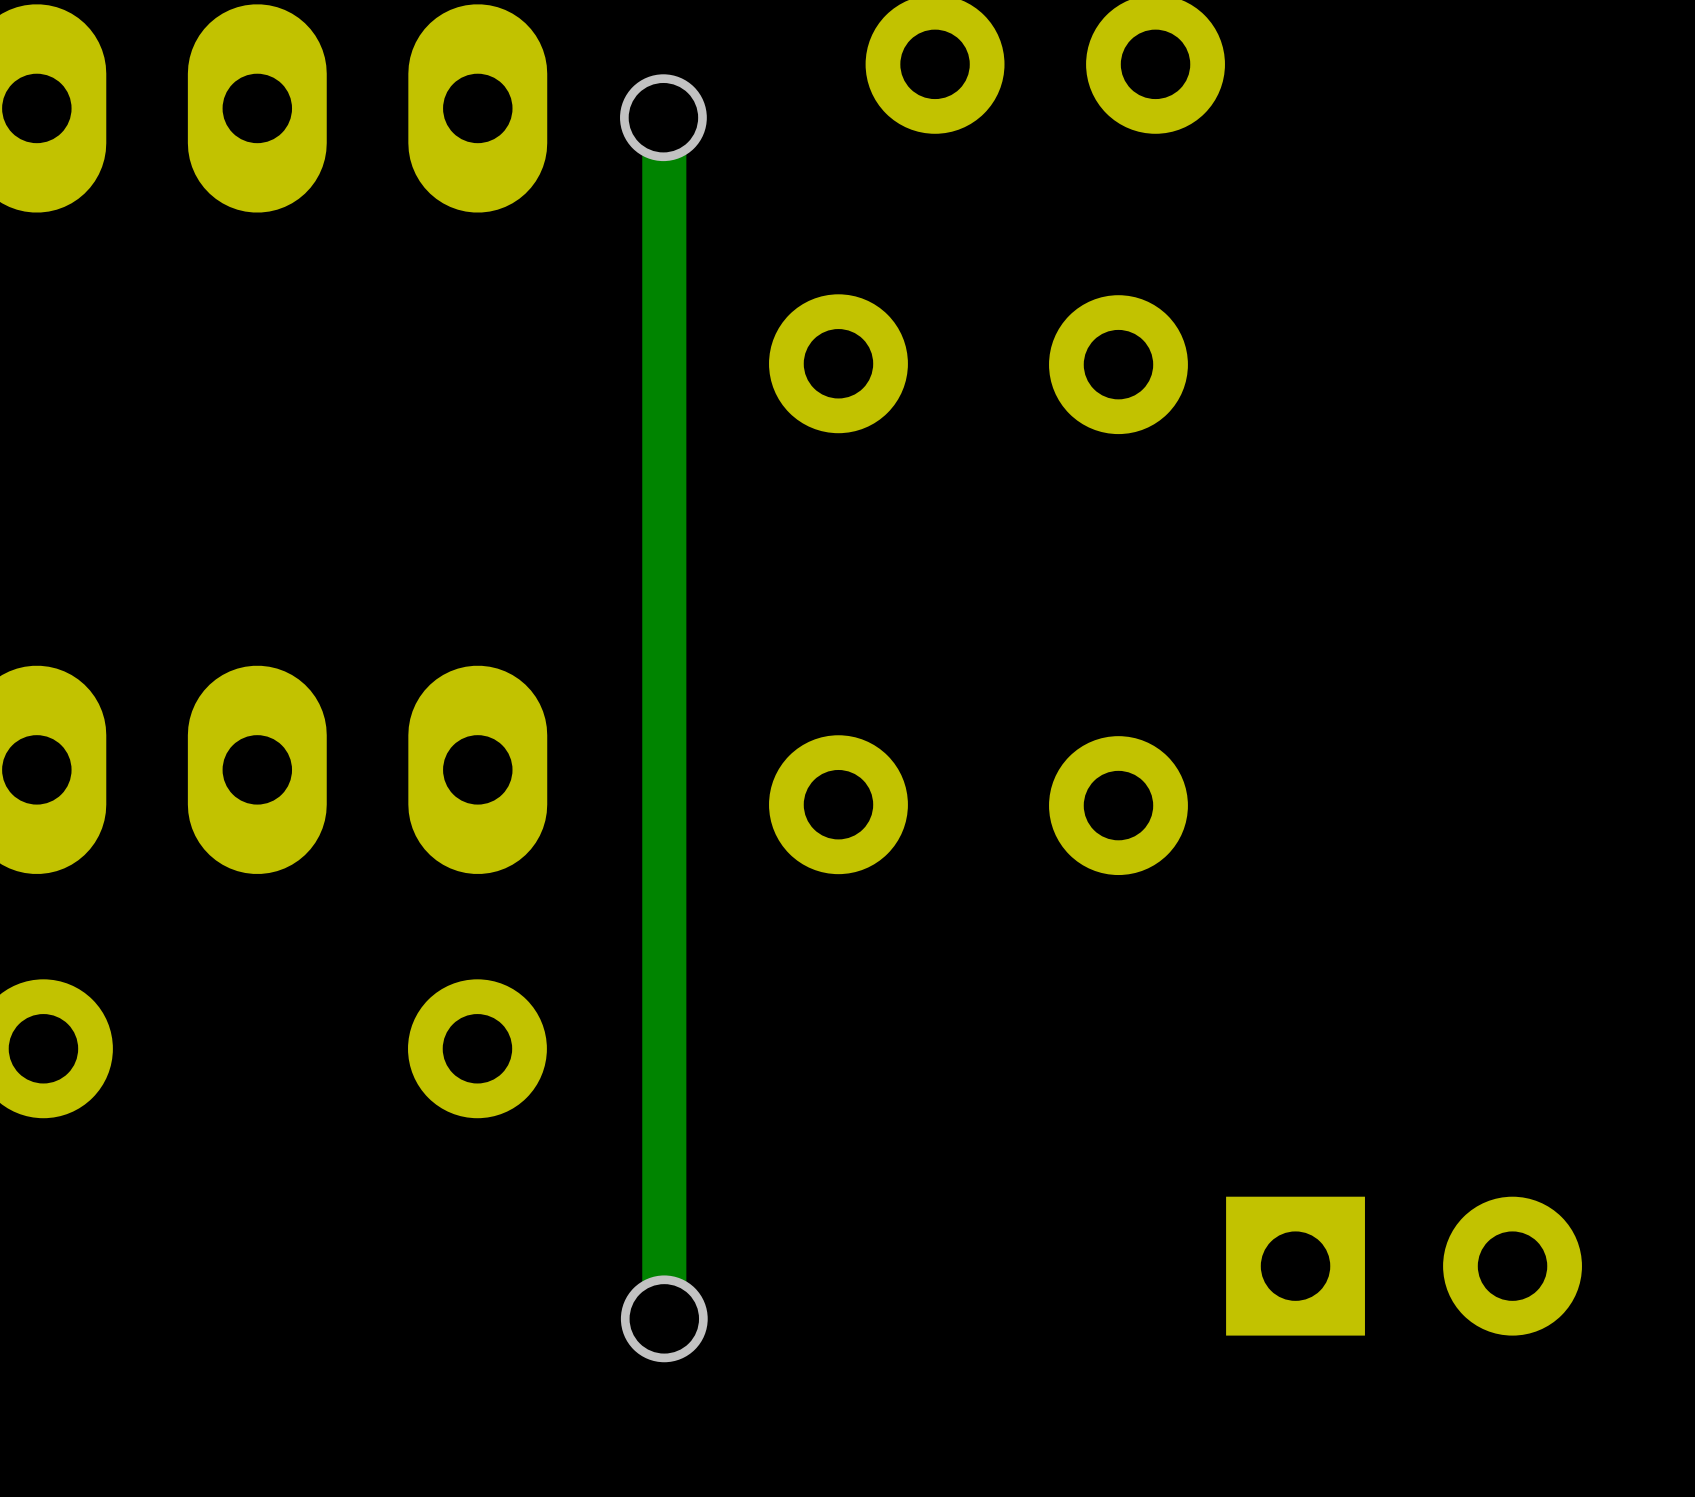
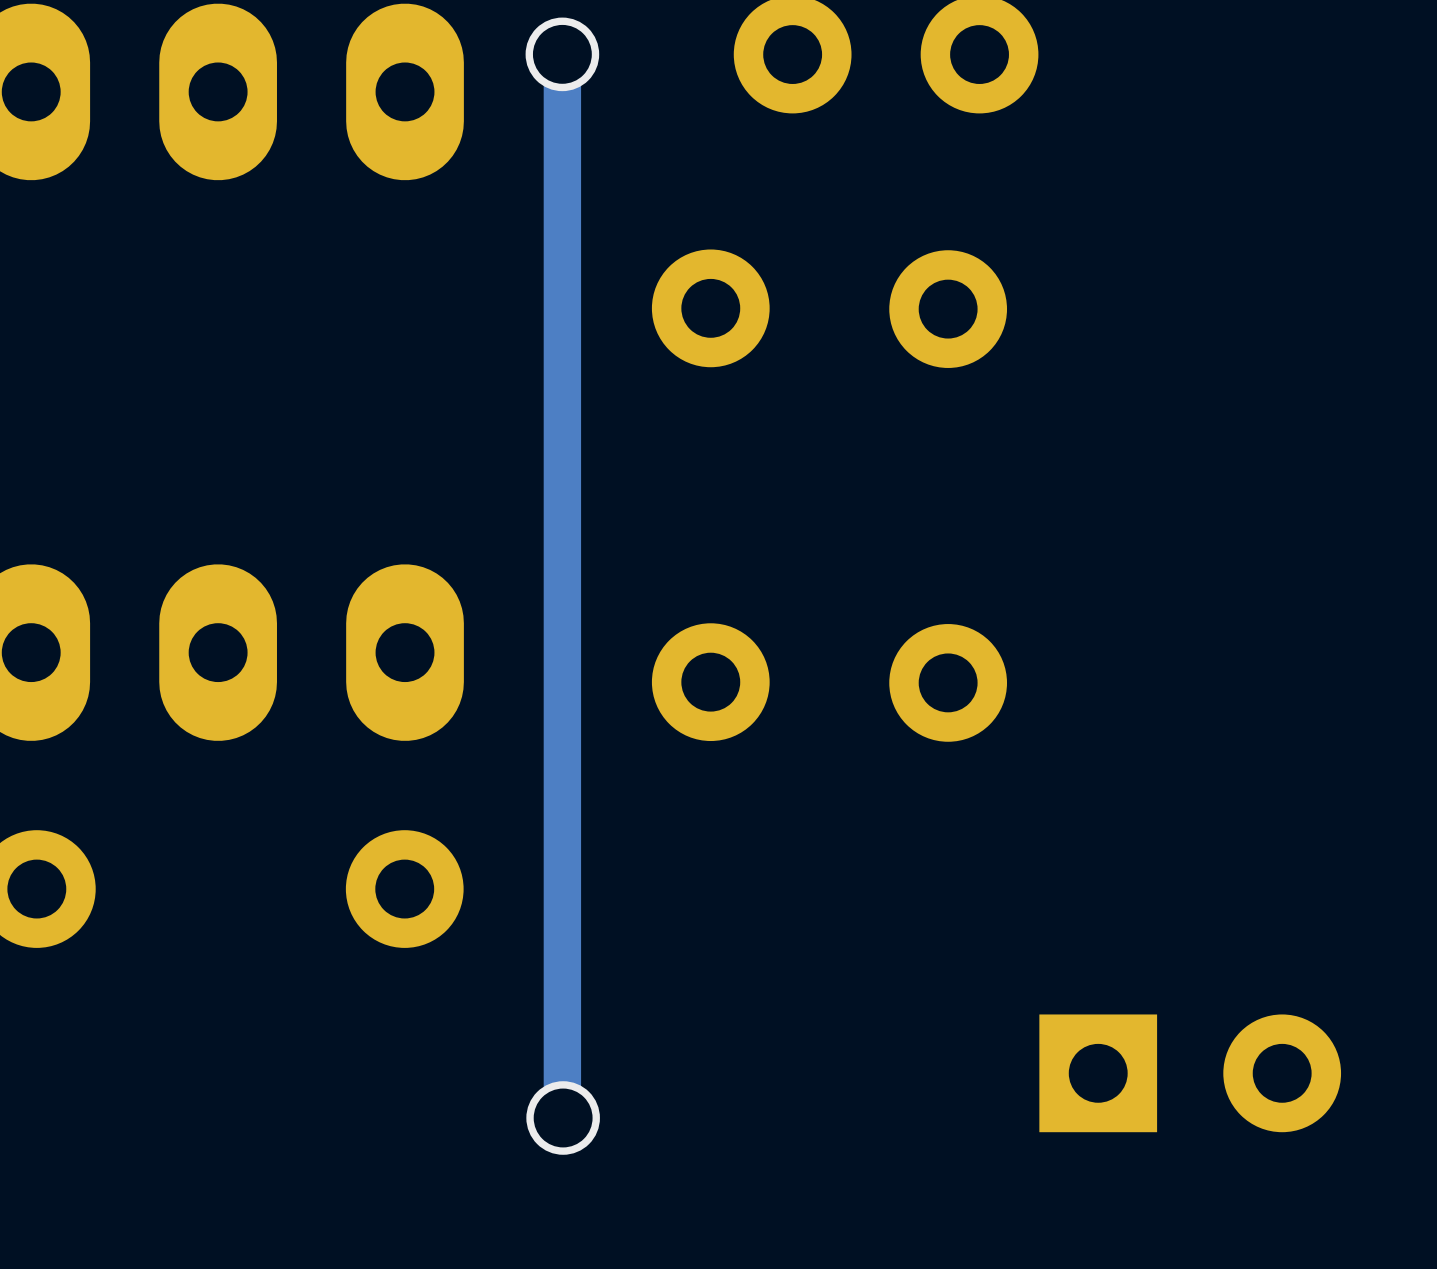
via position: (663, 117) -> (562, 54)
track: (664, 118) (664, 1318) -> (562, 54) (562, 1117)

